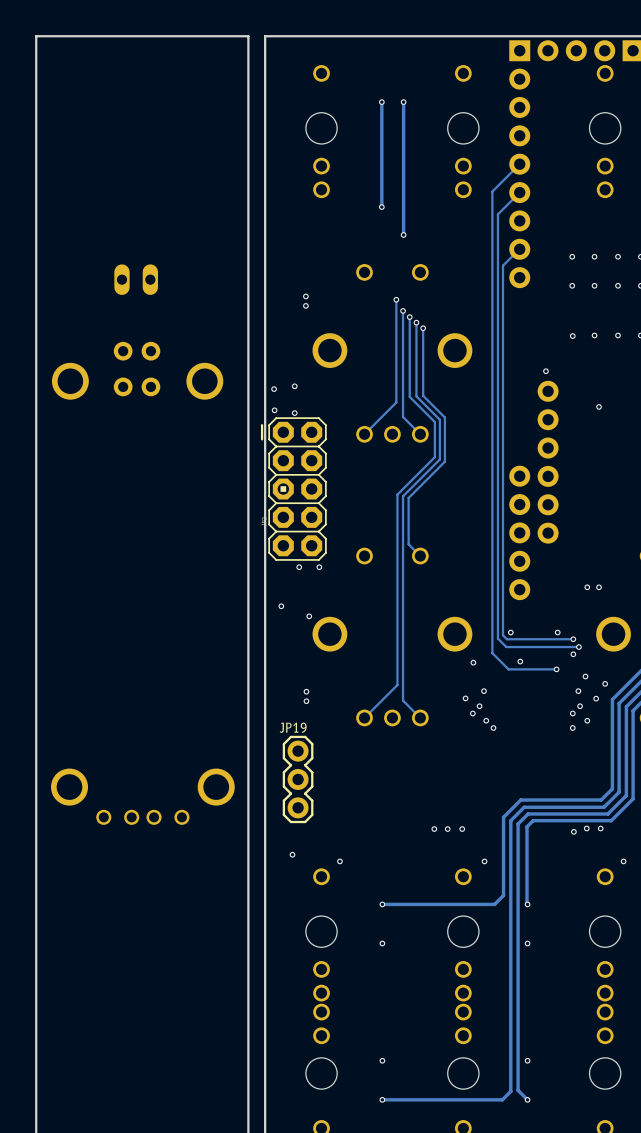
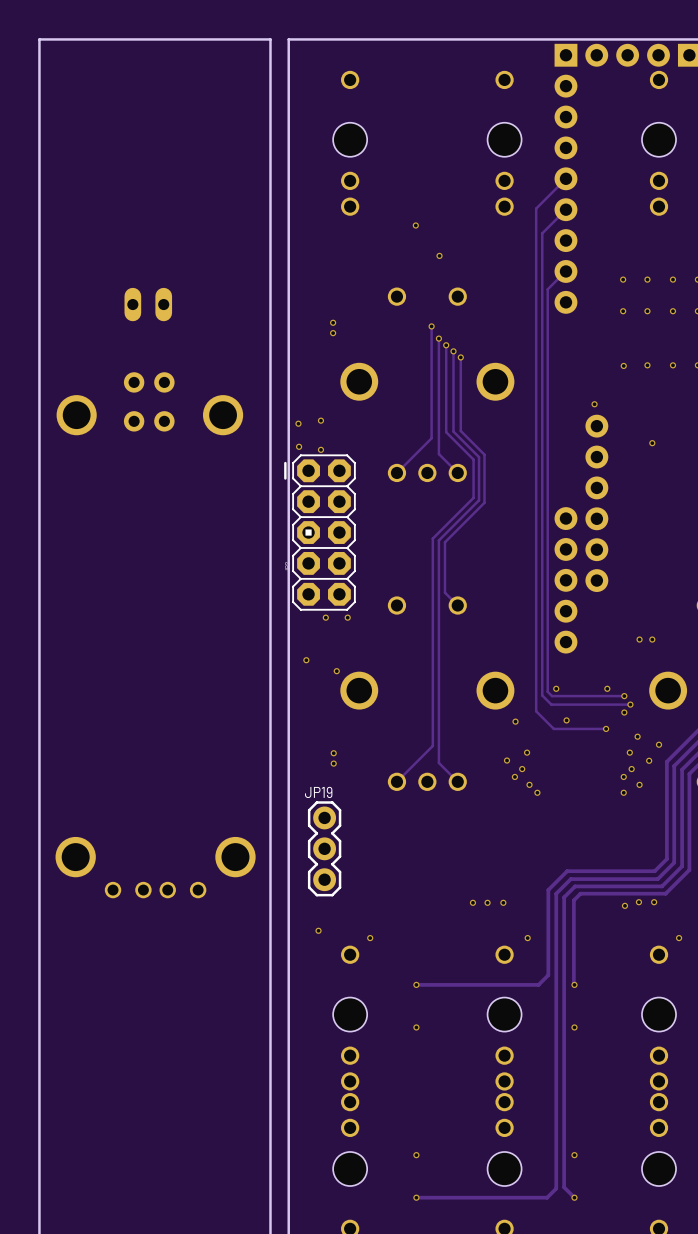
track: (381, 102) (381, 207) -> none
via: (381, 102) -> none
track: (403, 102) (403, 234) -> none
via: (403, 102) -> none

